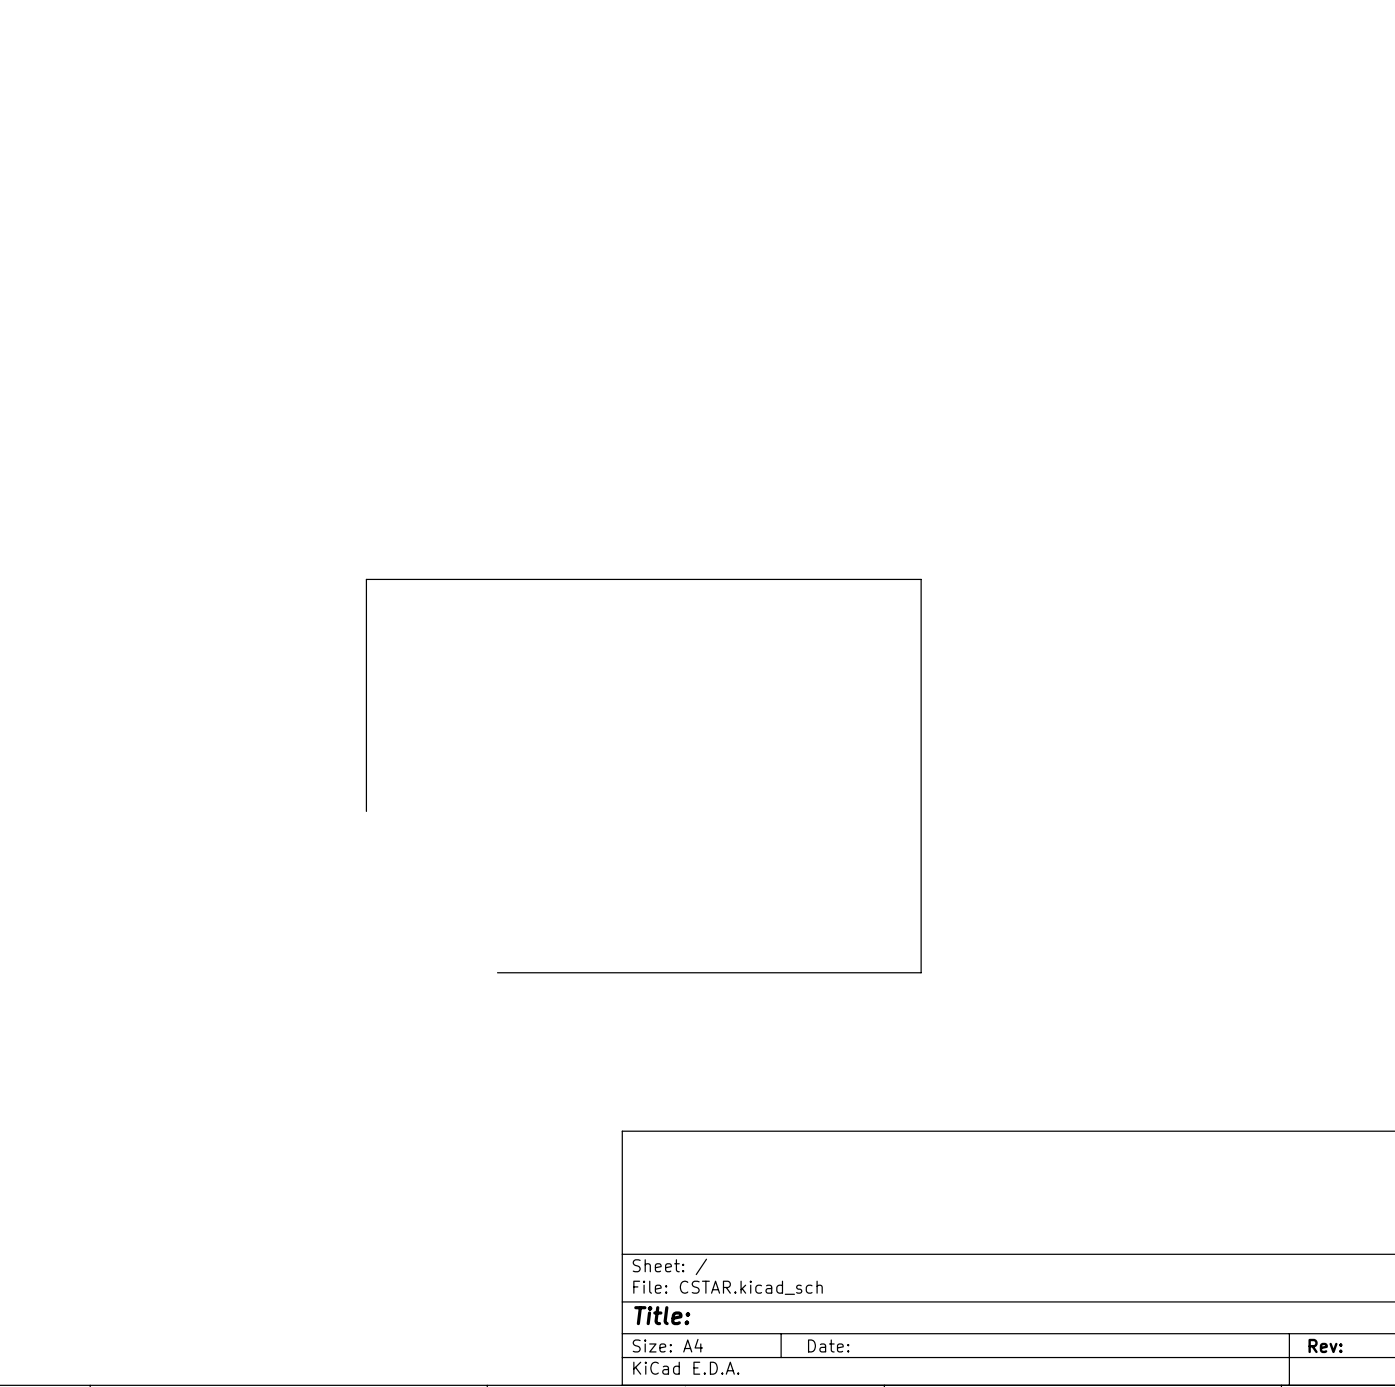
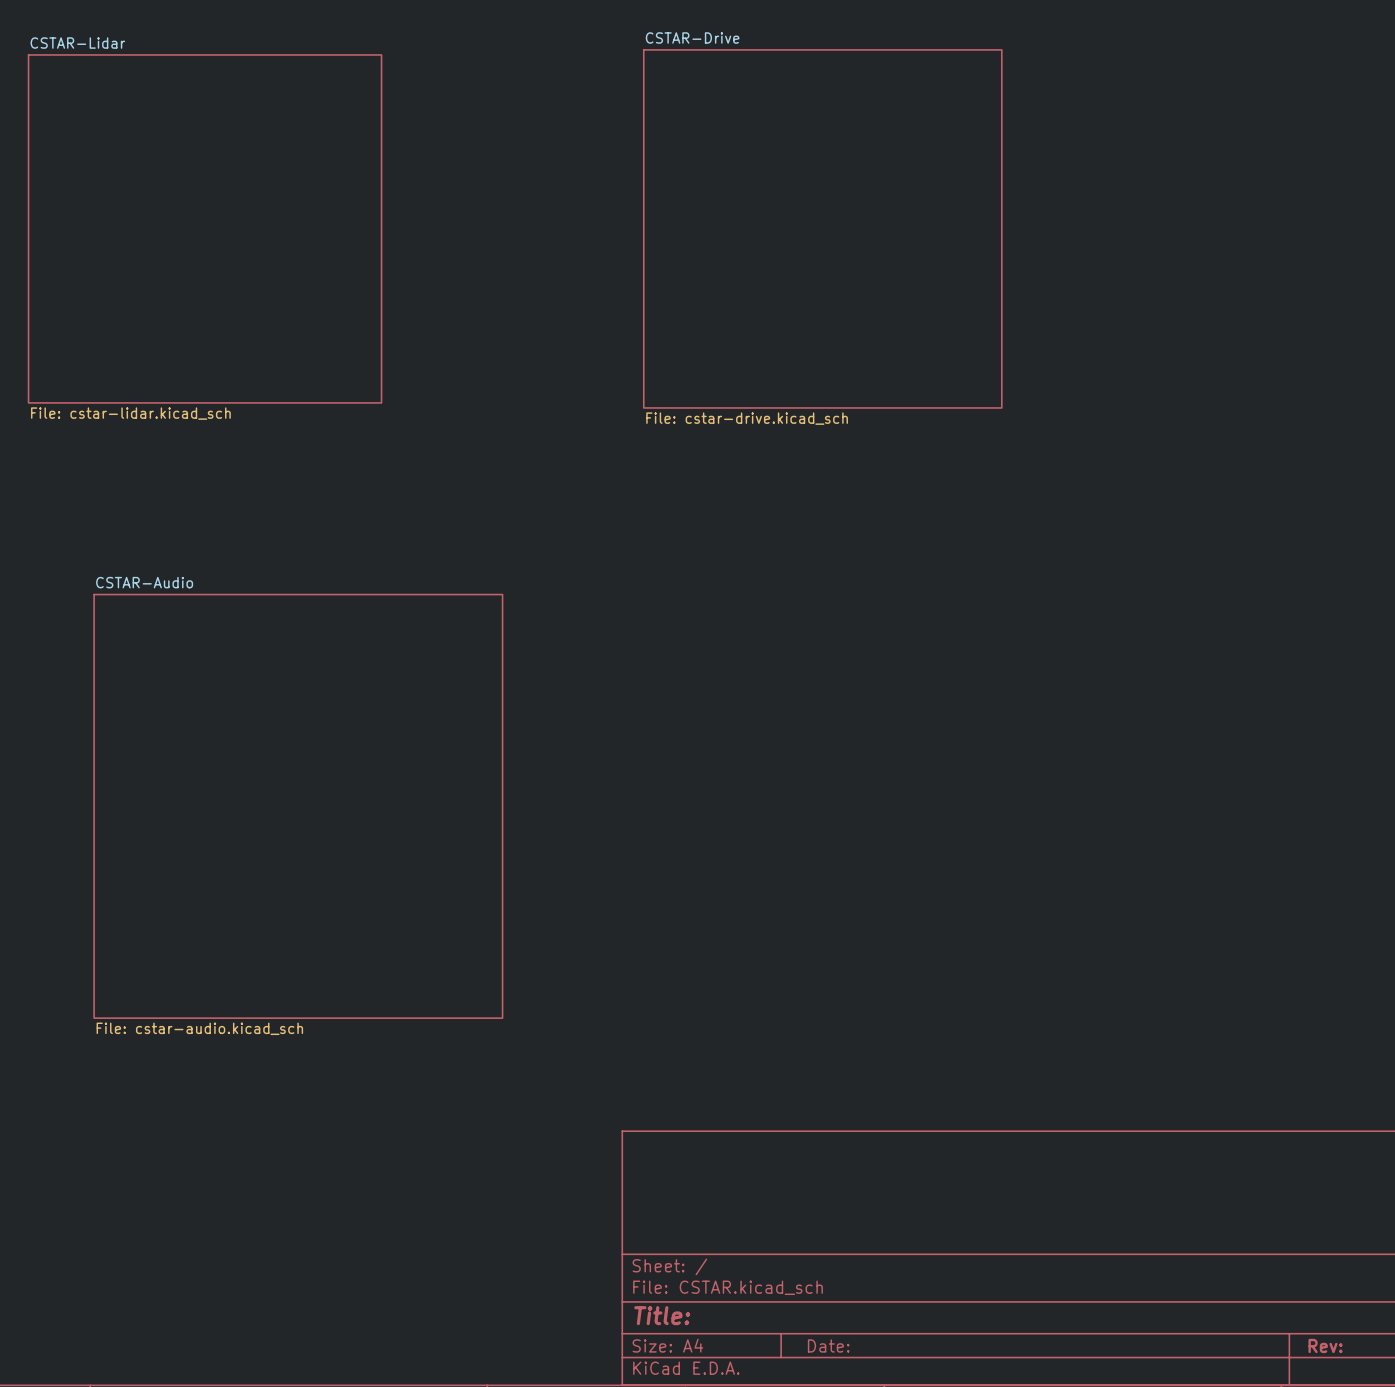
sheet CSTAR-Lidar: none -> File: cstar-lidar.kicad_sch (205, 228)
sheet CSTAR-Drive: none -> File: cstar-drive.kicad_sch (822, 228)
sheet CSTAR-Audio: none -> File: cstar-audio.kicad_sch (298, 806)
wire: (366, 811) (366, 579) (921, 579) (921, 972) (497, 972) -> none

